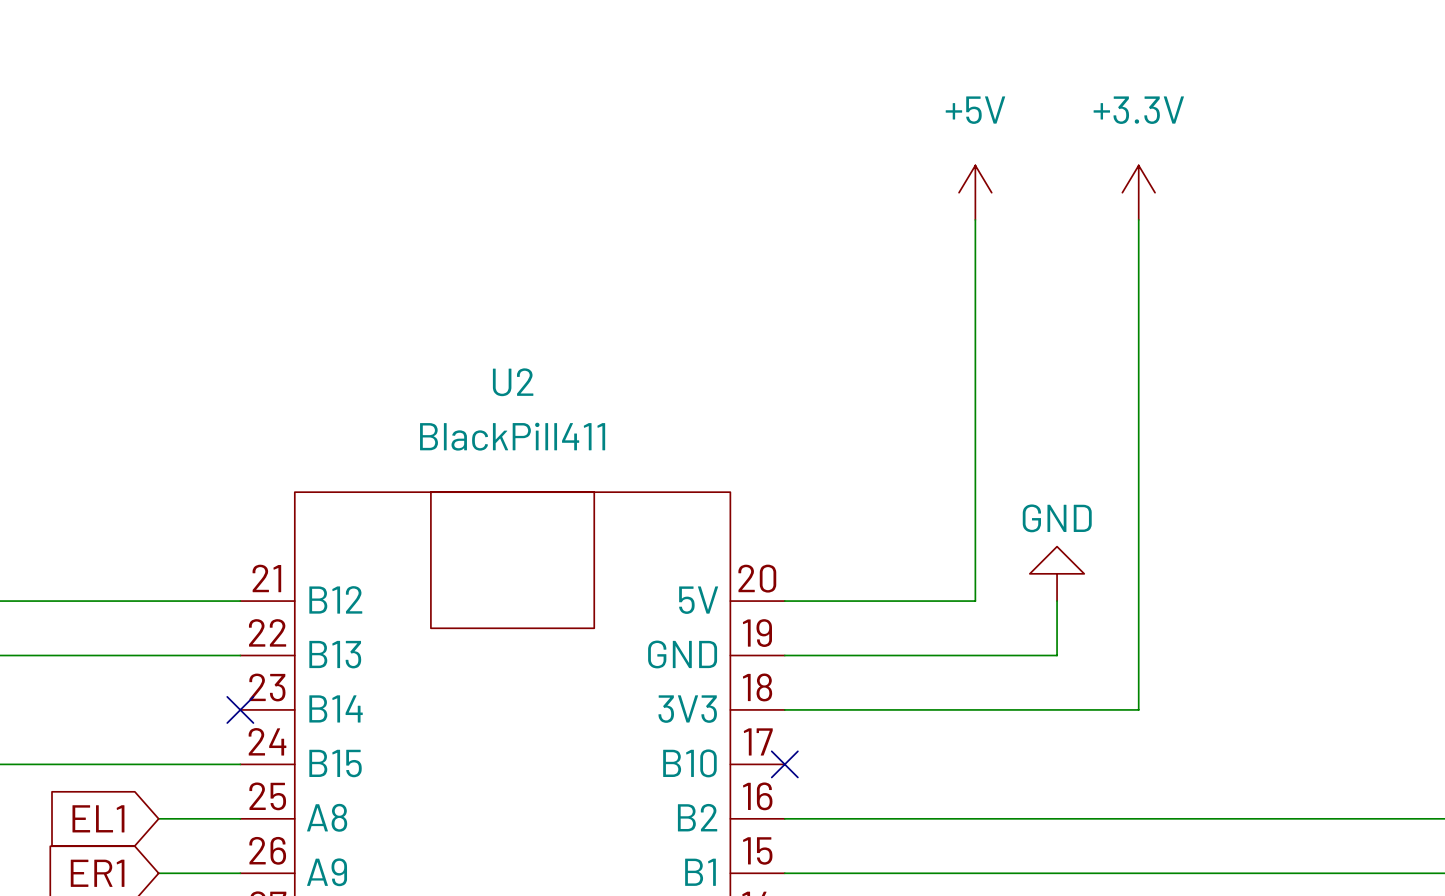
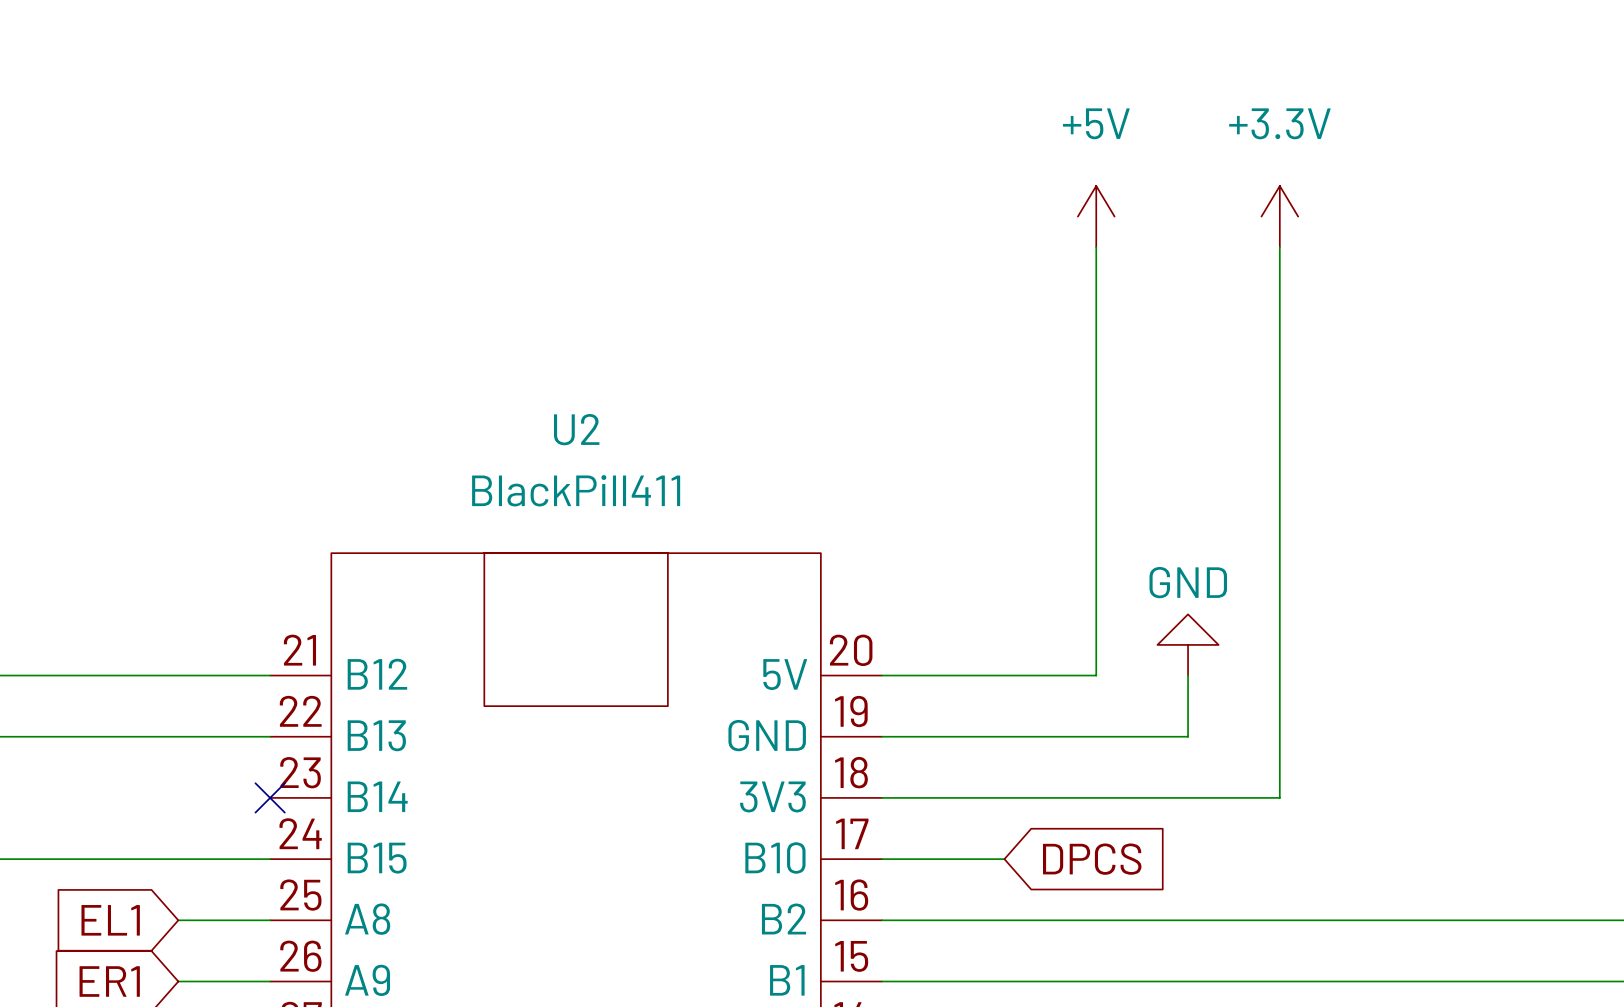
wire: none -> (882, 859) (1004, 859)
no-connect mark: (784, 764) -> none
global label: none -> DPCS (1092, 859)

